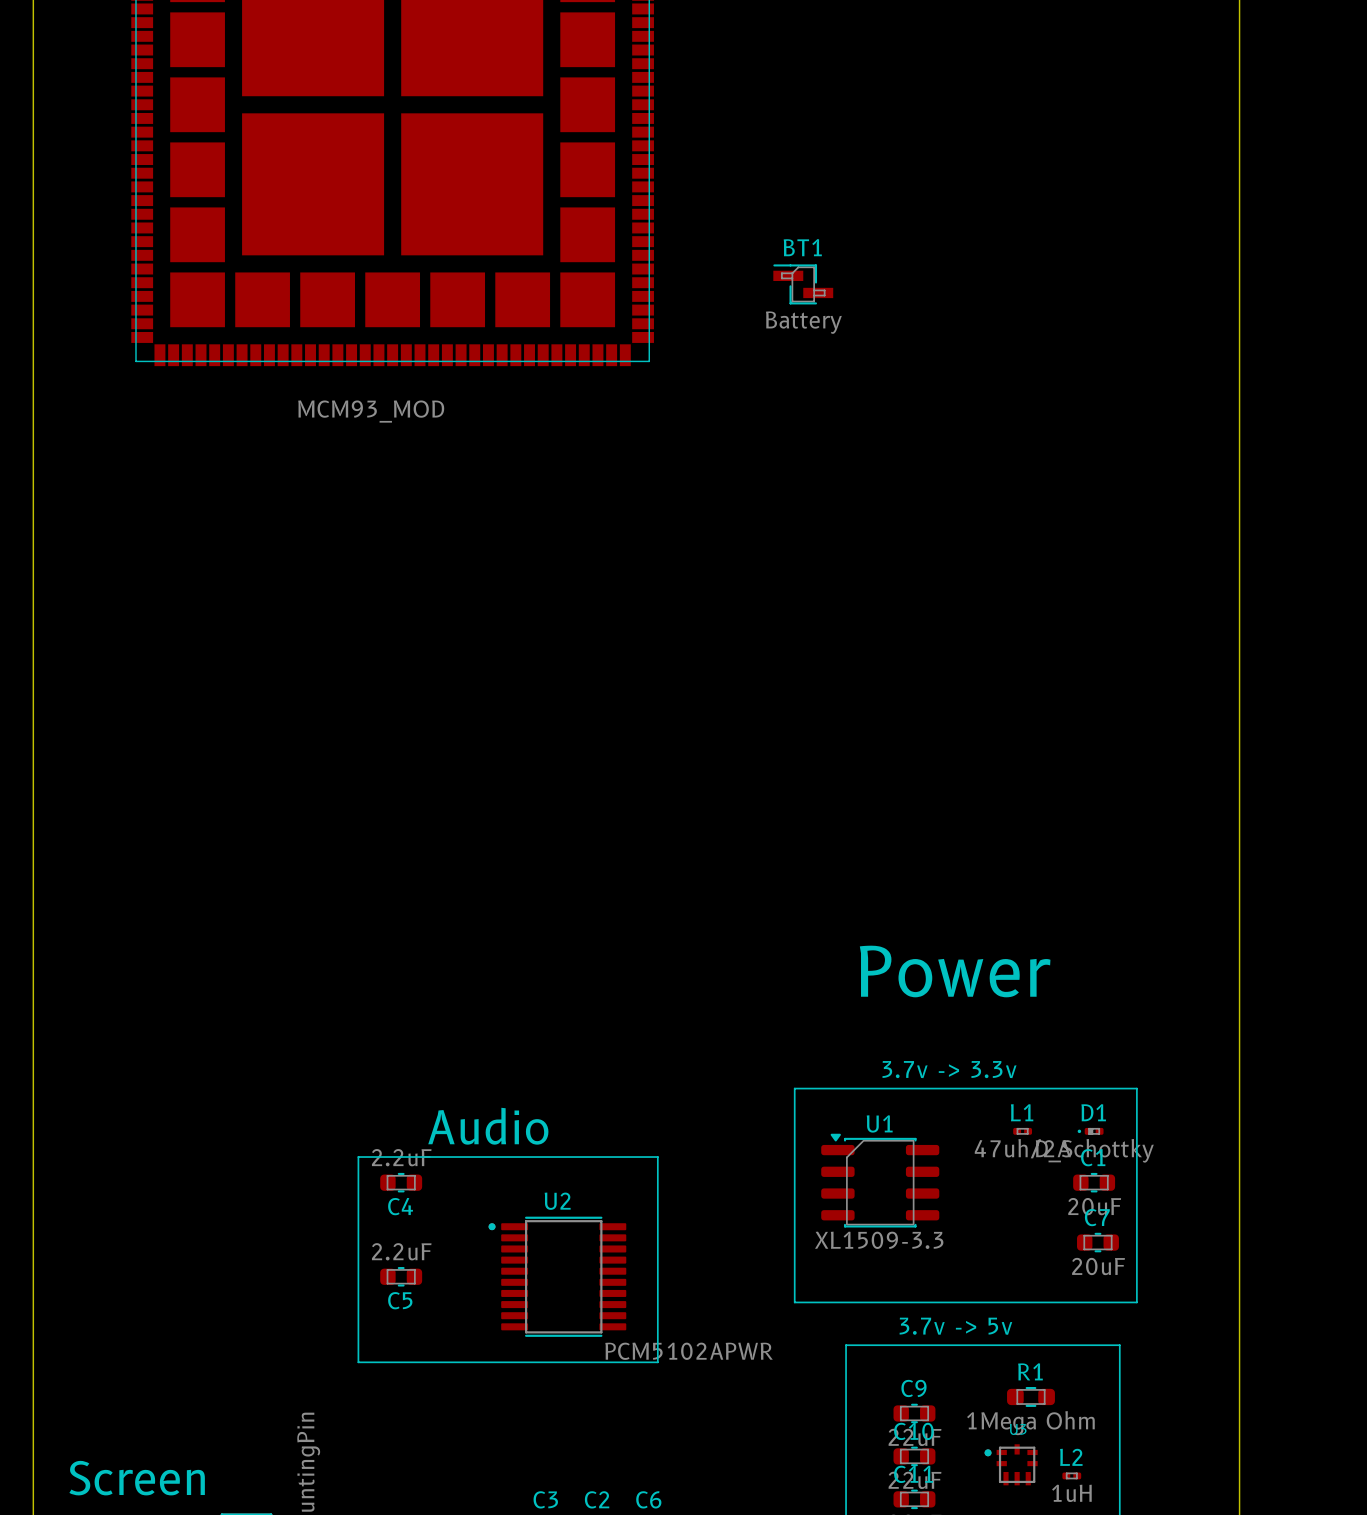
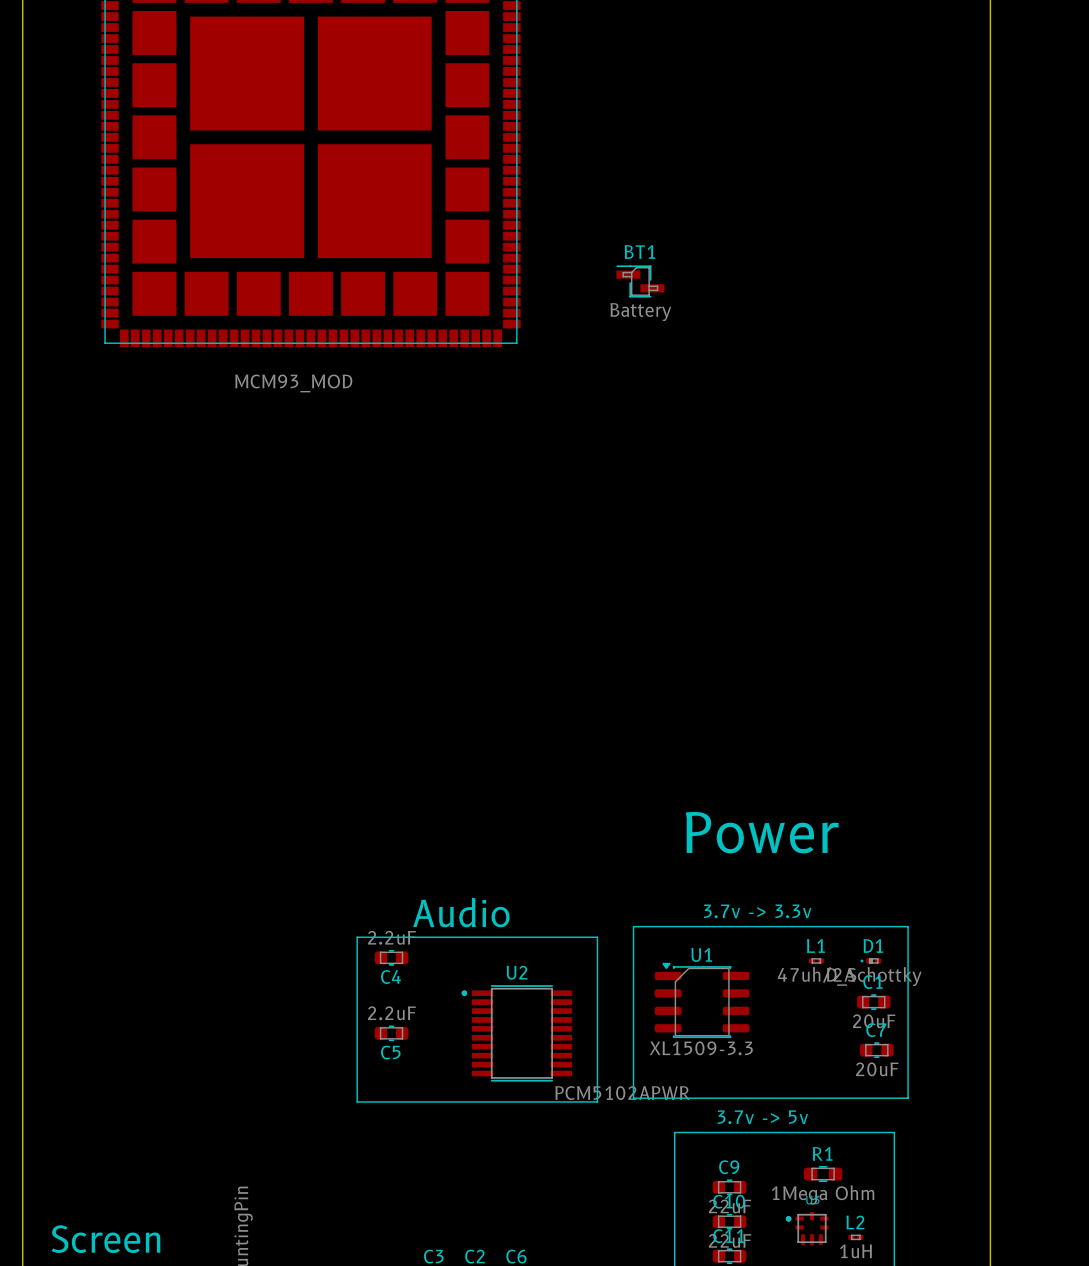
text position: Audio (488, 1126) -> Audio (461, 912)
line: (358, 1157) (657, 1157) (657, 1362) (358, 1362) (358, 1157) -> (357, 937) (597, 937) (597, 1101) (357, 1101) (357, 937)
C4 position: (401, 1182) -> (391, 957)
C5 position: (401, 1276) -> (391, 1033)
U2 position: (557, 1276) -> (516, 1033)

